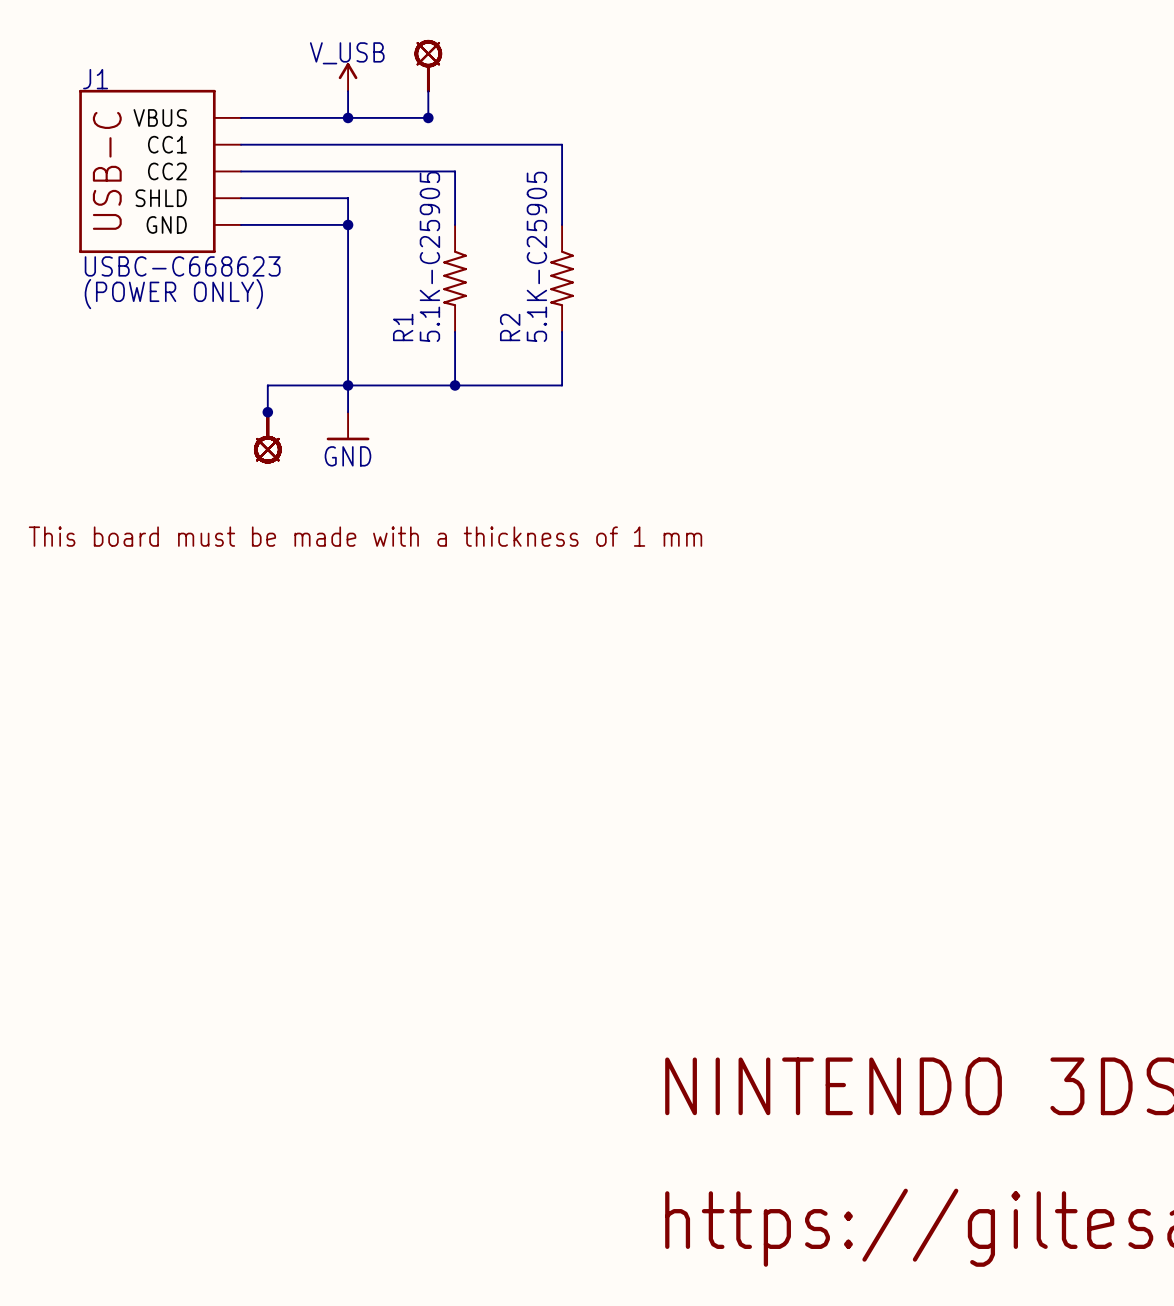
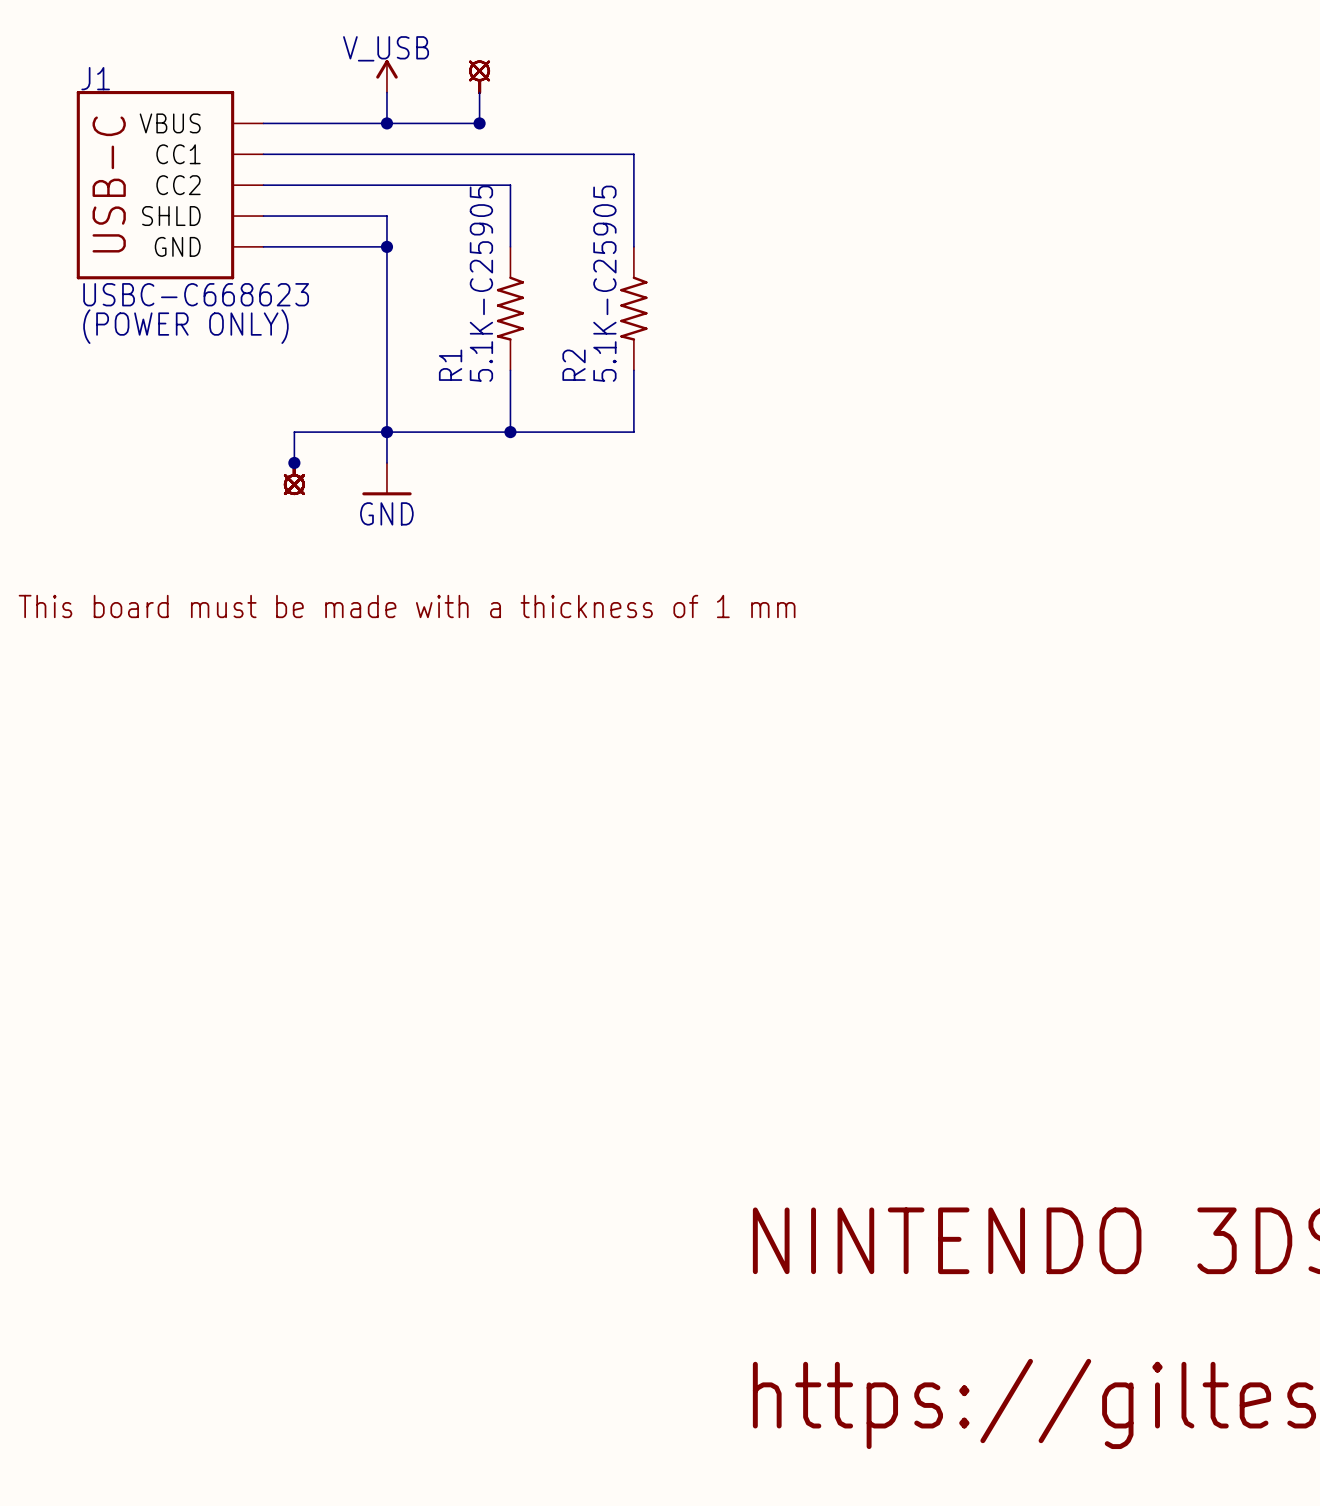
part: (428, 66) -> none
part: none -> (479, 77)
part: none -> (294, 478)
part: (267, 437) -> none

